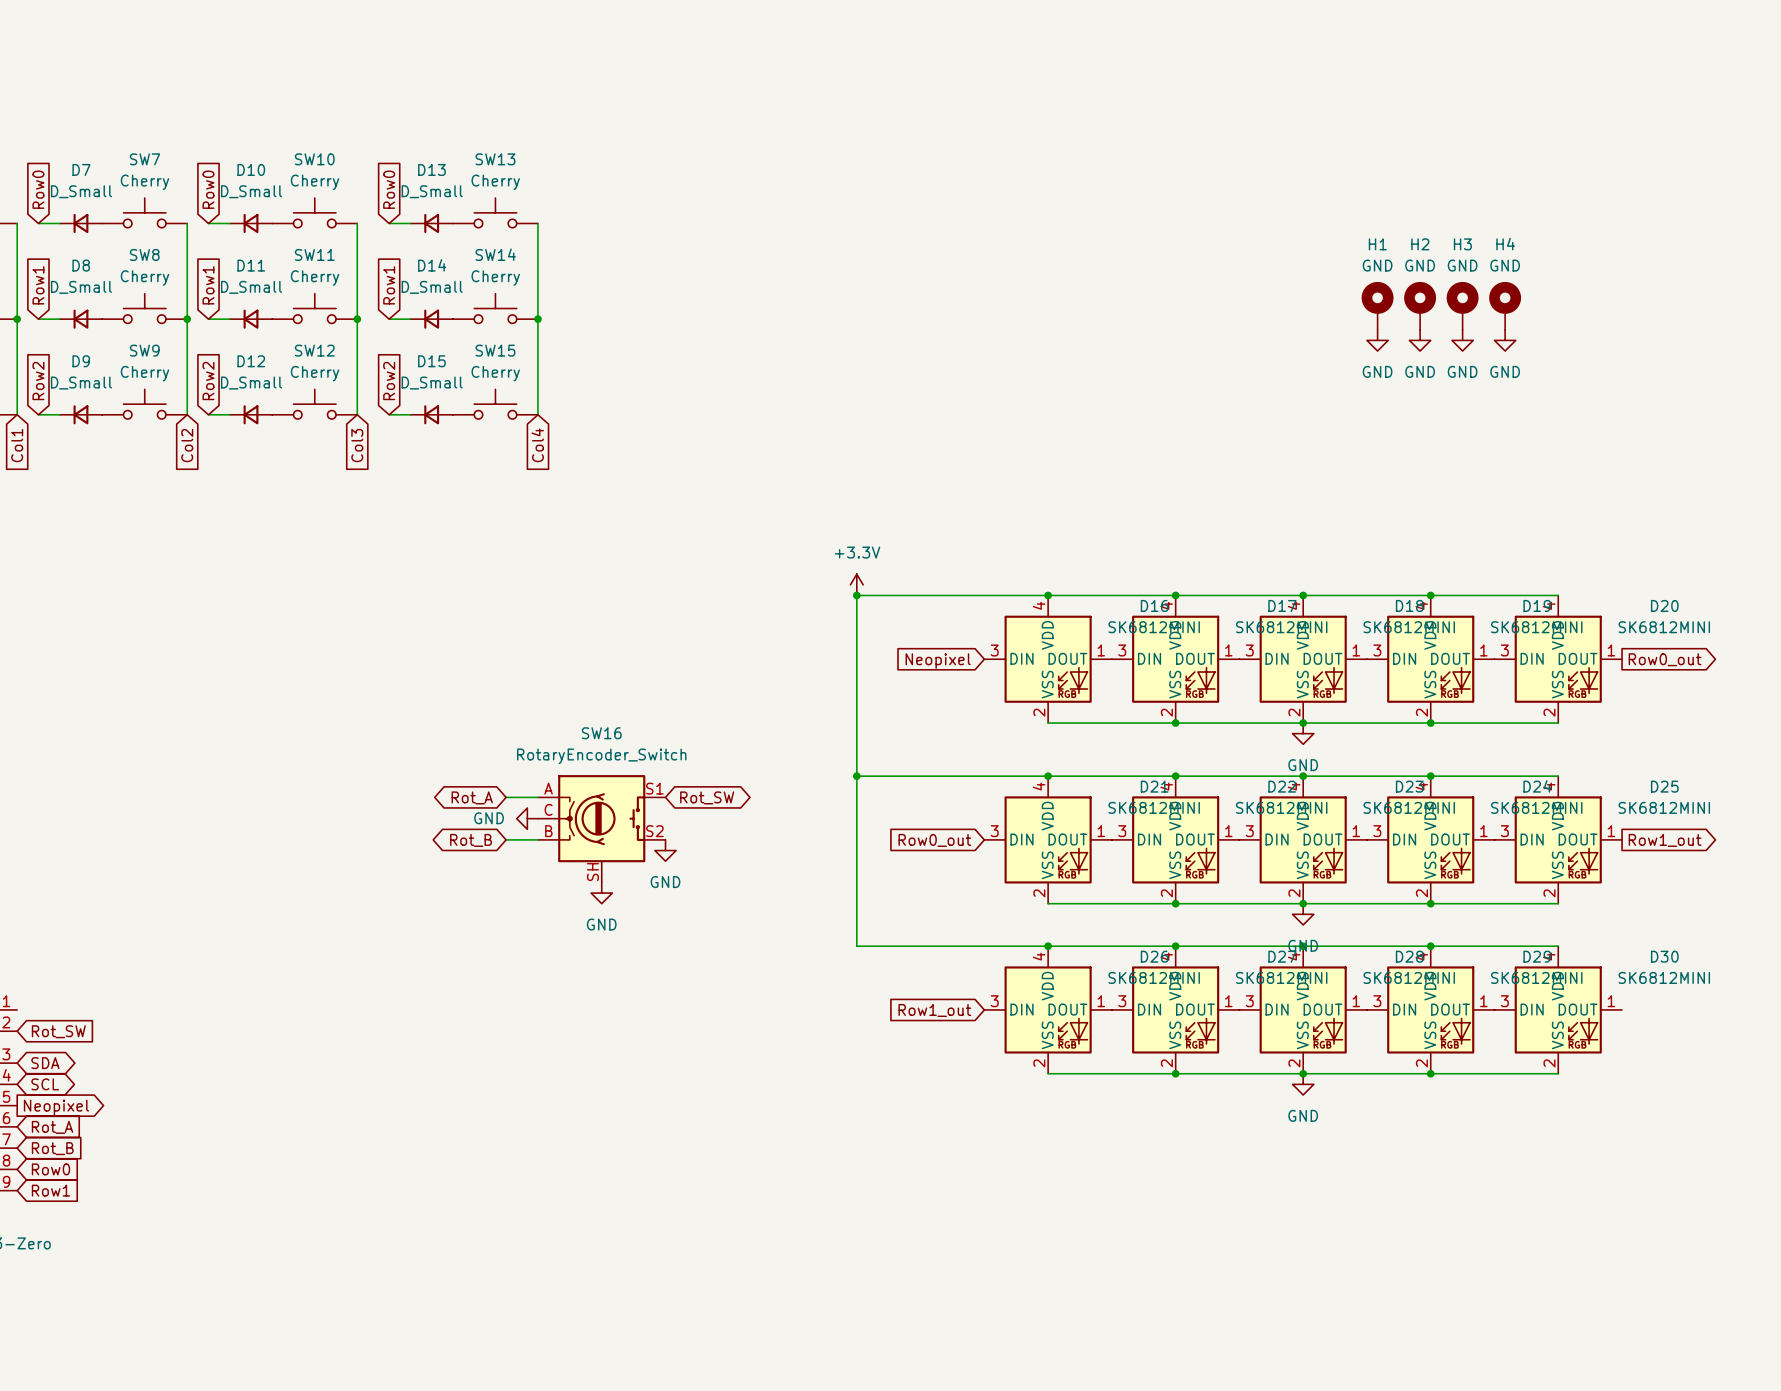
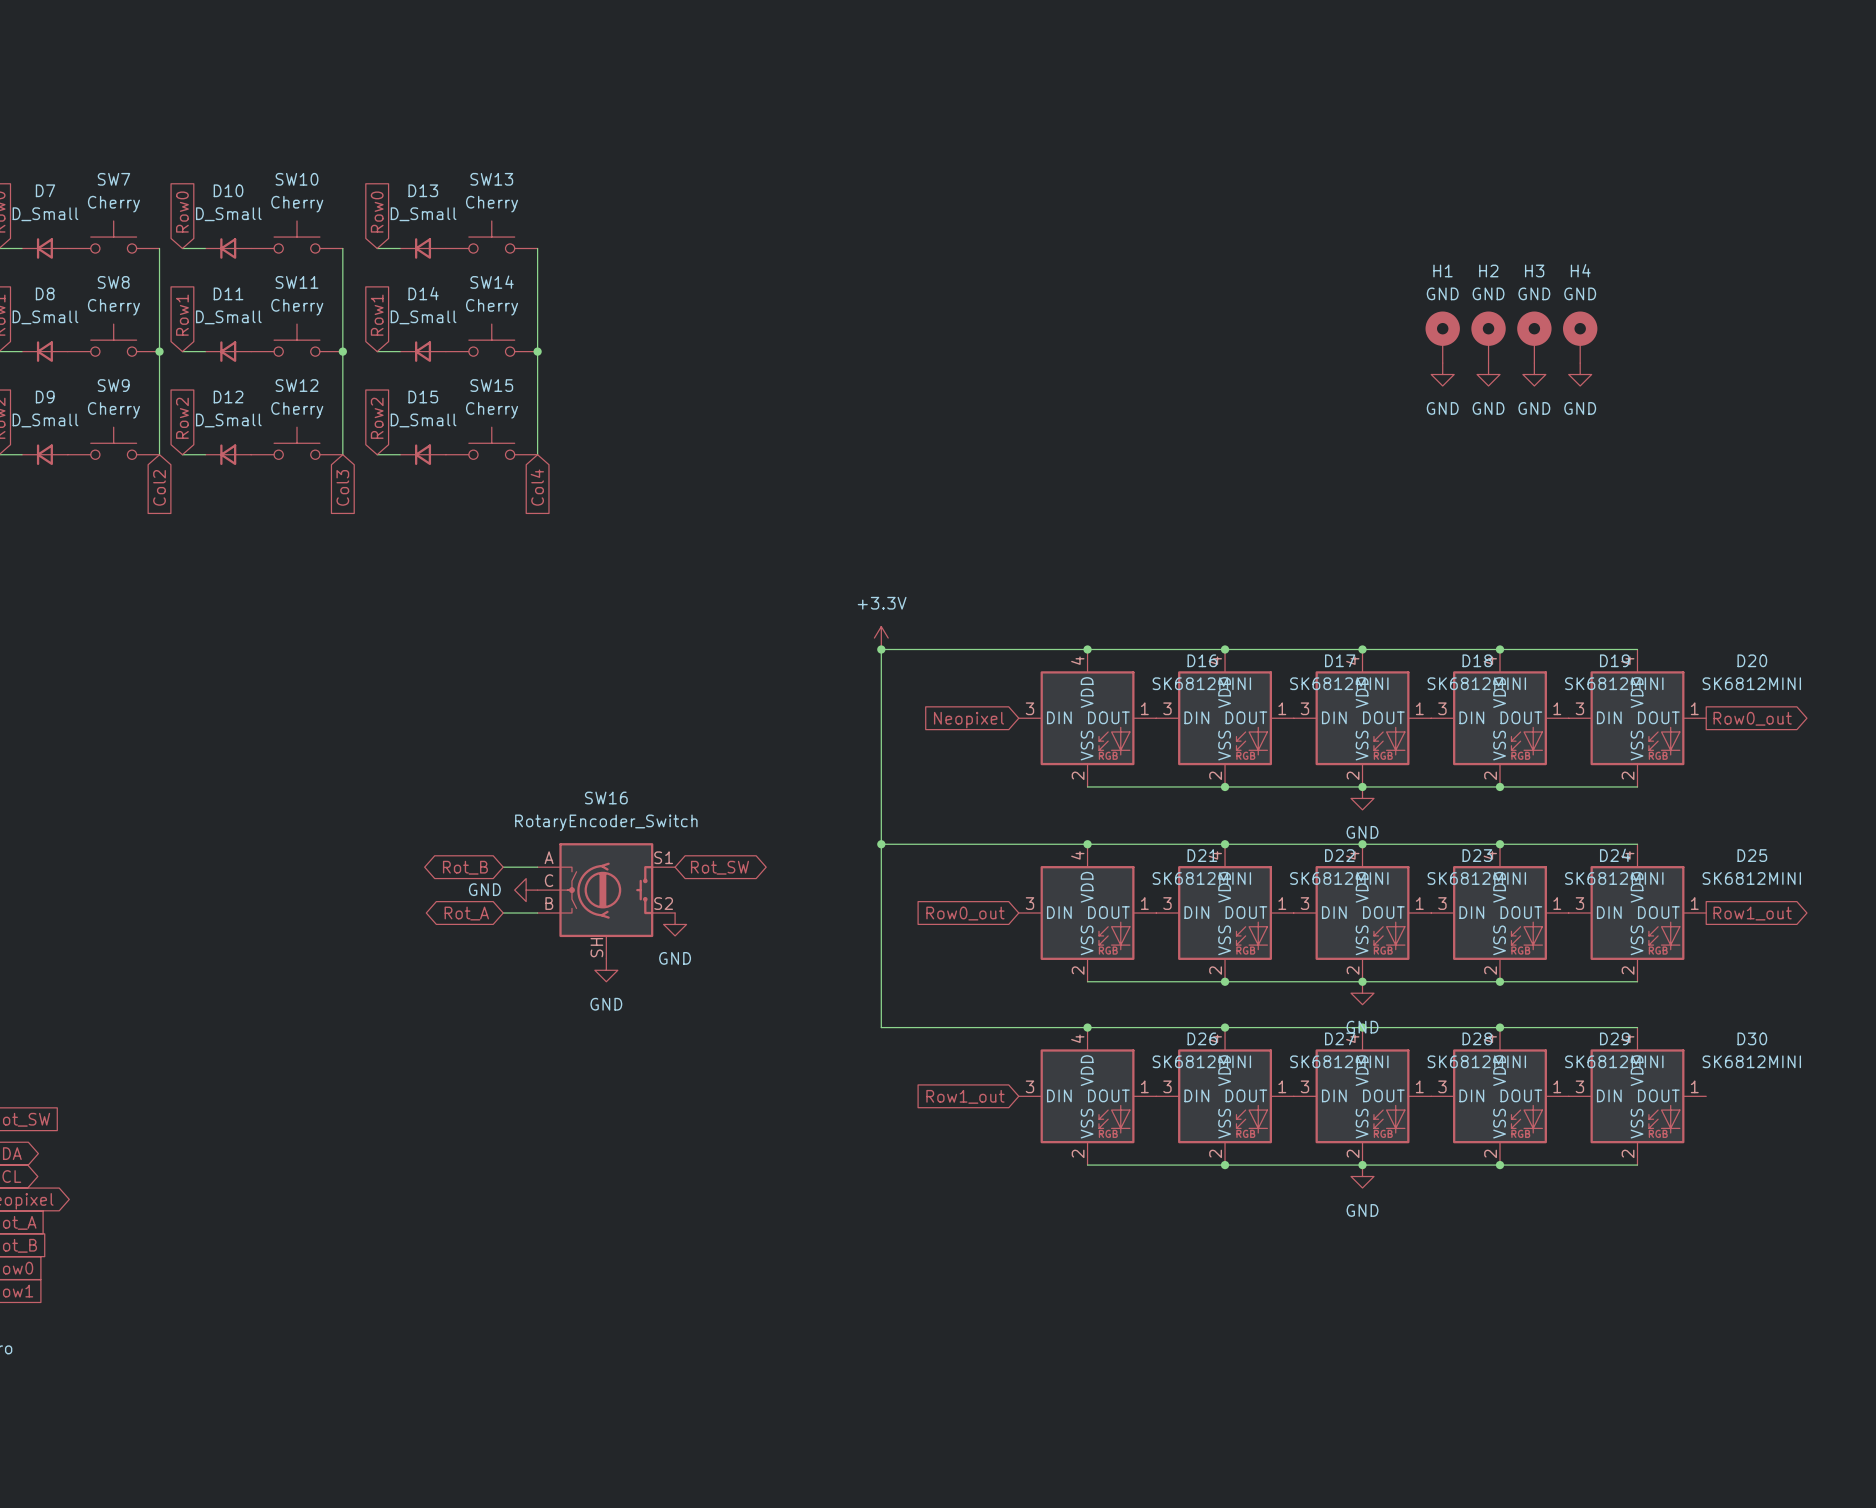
global label: Rot_A (472, 797) -> Rot_B (465, 867)
global label: Rot_B (471, 840) -> Rot_A (466, 913)

